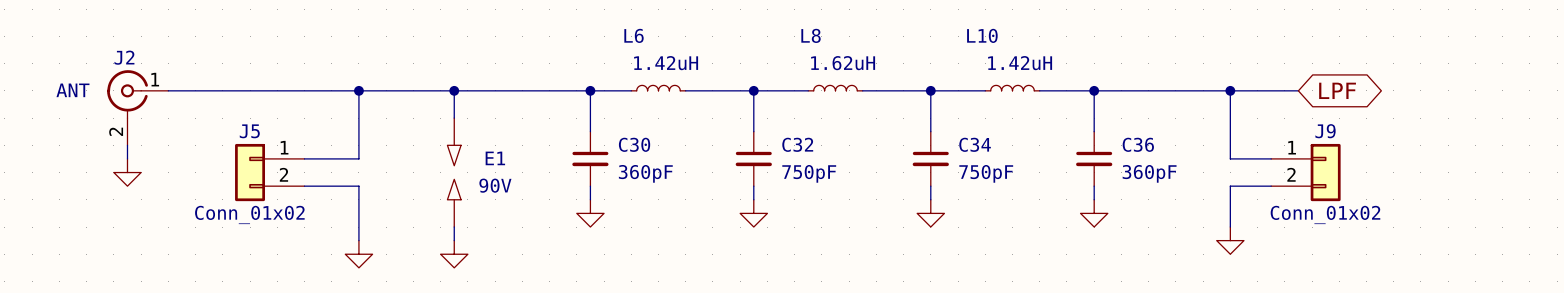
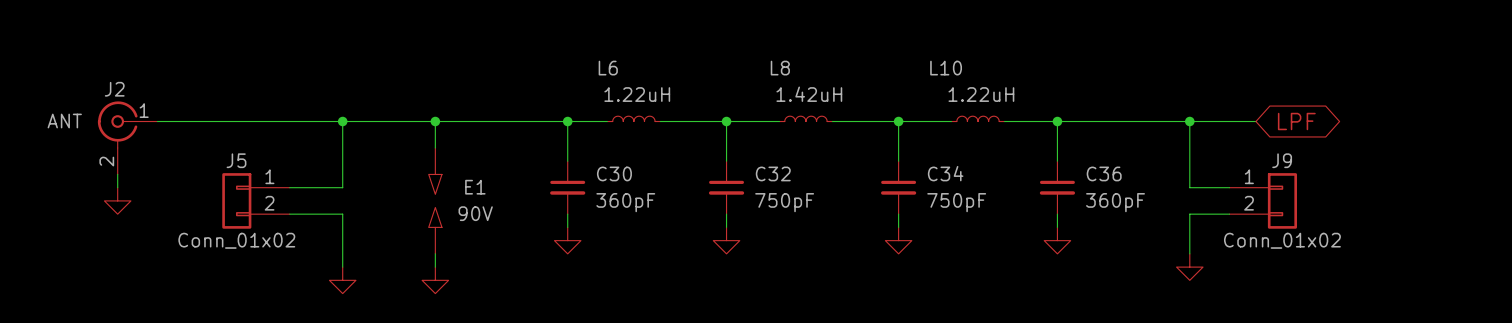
L6 value: 1.42uH (666, 63) -> 1.22uH (637, 94)
L8 value: 1.62uH (843, 63) -> 1.42uH (809, 94)
L10 value: 1.42uH (1020, 63) -> 1.22uH (981, 94)

